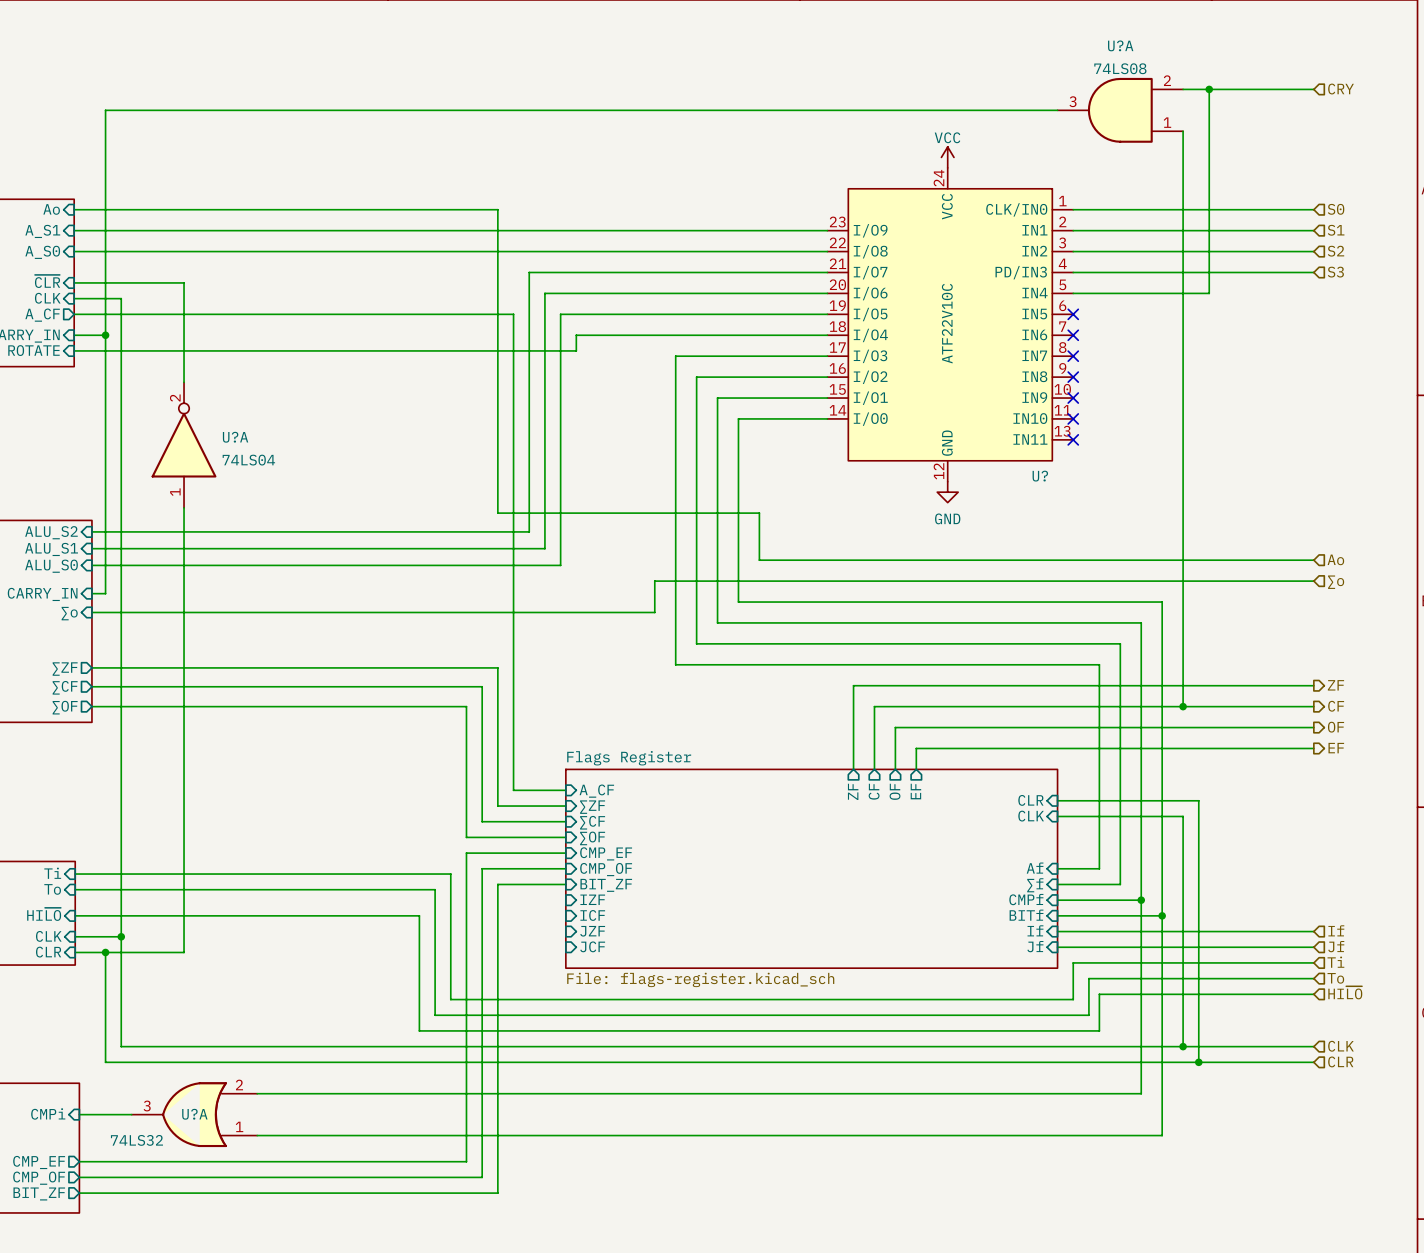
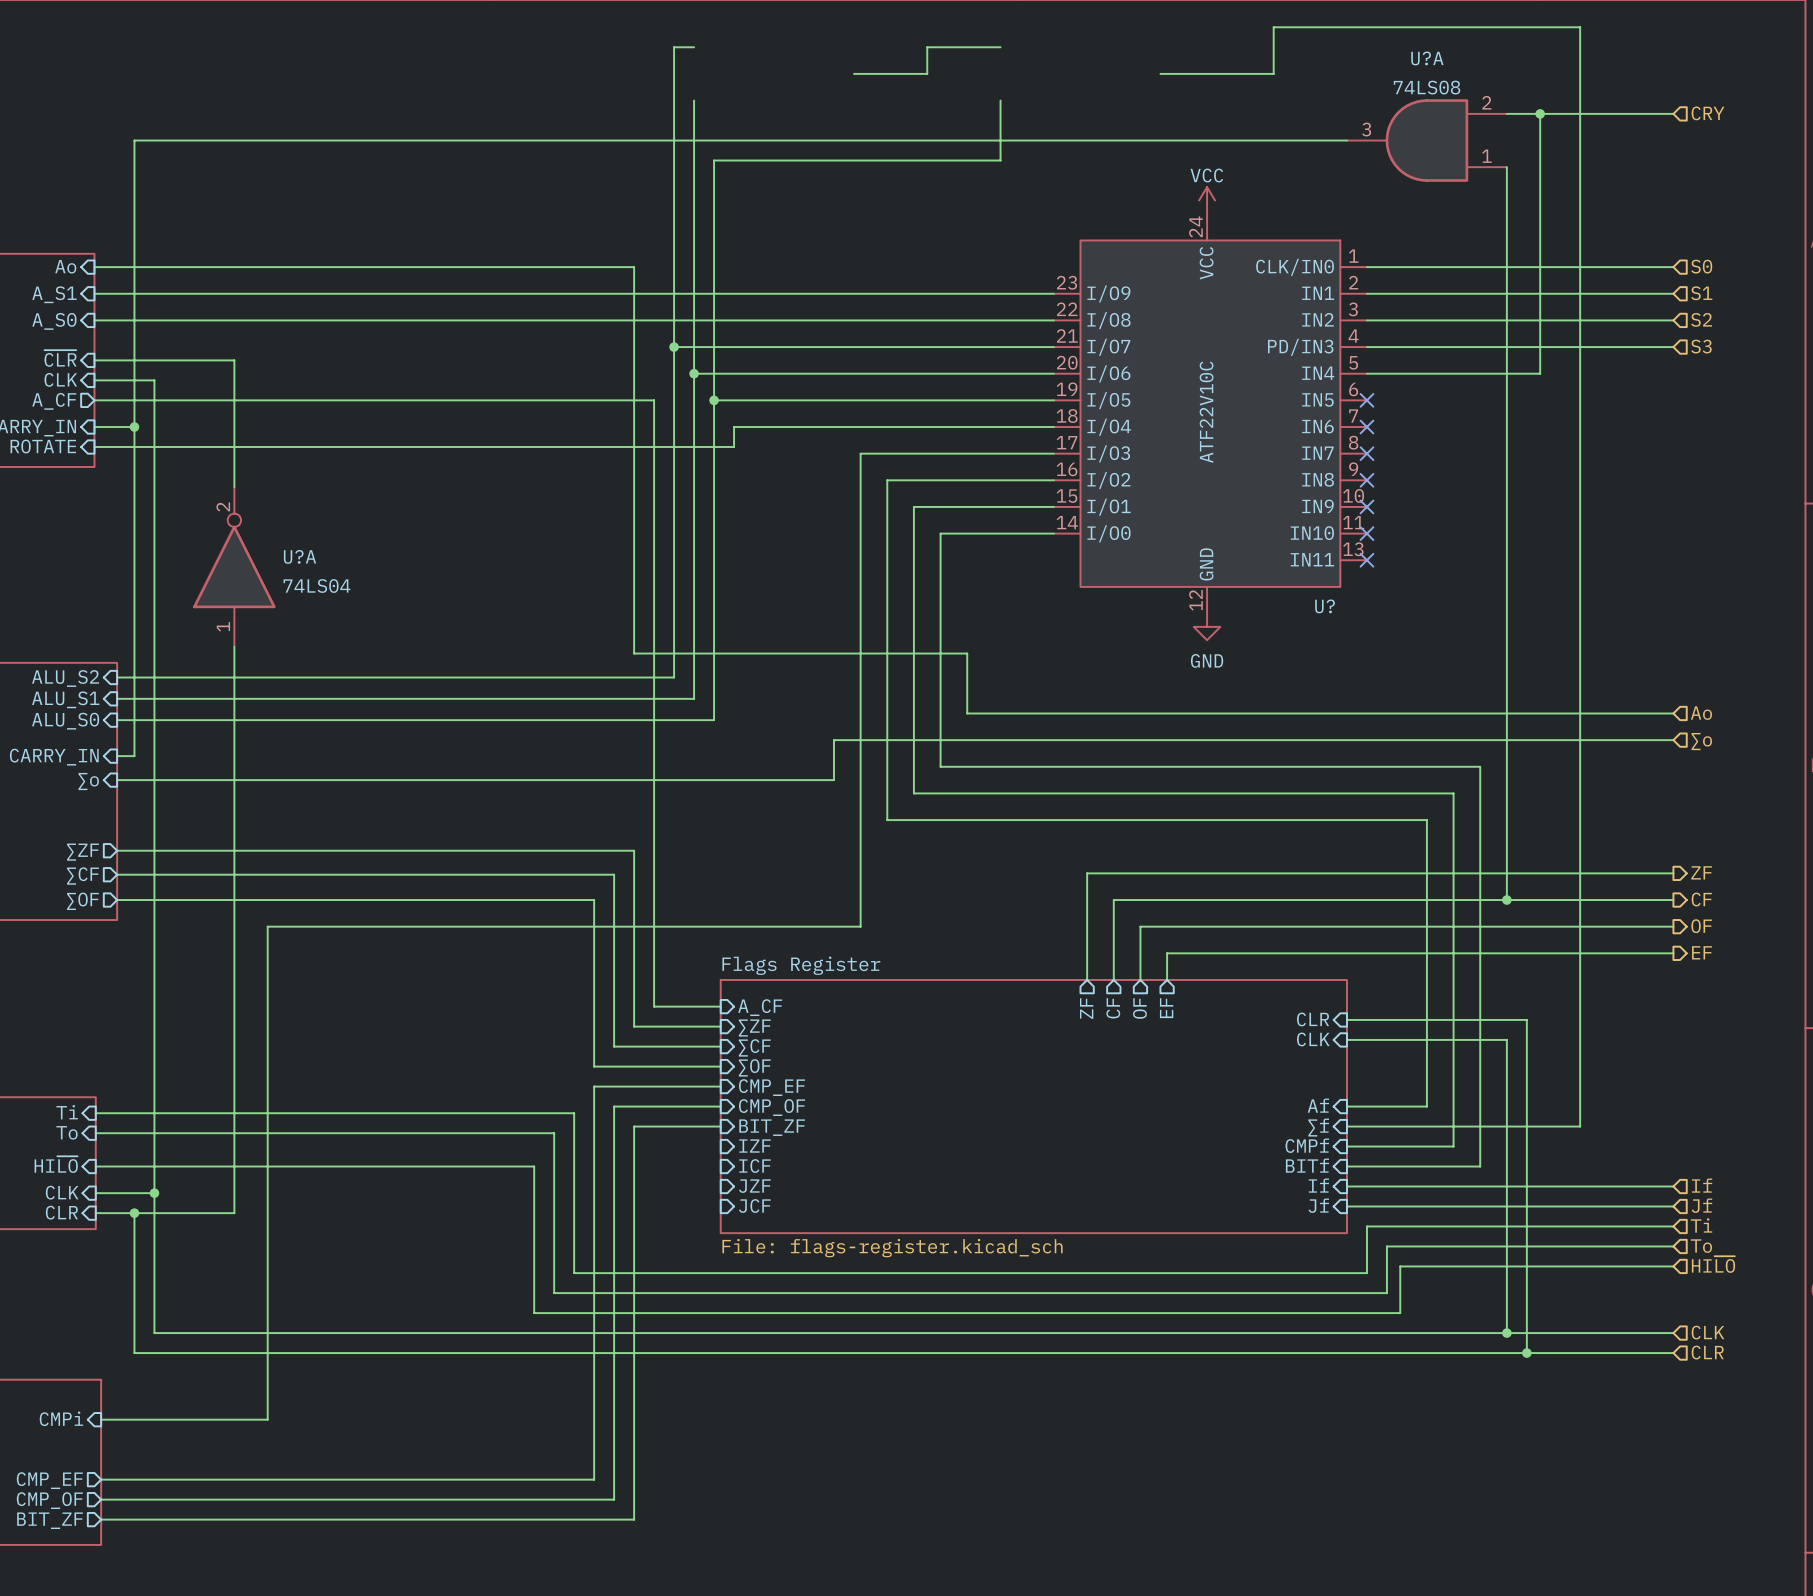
wire: none -> (694, 47) (674, 47) (674, 347)
wire: none -> (1000, 47) (927, 47) (927, 73) (853, 73)
wire: none -> (1160, 73) (1273, 73) (1273, 27) (1580, 27) (1580, 1126) (1426, 1126)
wire: none -> (694, 100) (694, 373)
wire: none -> (1000, 100) (1000, 160) (714, 160) (714, 400)
junction: none -> (674, 347)
junction: none -> (694, 373)
junction: none -> (714, 400)
wire: (675, 664) (1099, 664) (1099, 868) -> (860, 846) (860, 926) (267, 926) (267, 1419) (167, 1419)
wire: (1120, 868) (1120, 884) -> (1426, 1106) (1400, 1106)
wire: (1141, 900) (1141, 1093) (257, 1093) -> none
junction: (1141, 900) -> none
wire: (1162, 915) (1162, 1135) (257, 1135) -> none
junction: (1162, 915) -> none
U?A: 74LS32 (194, 1114) -> none

